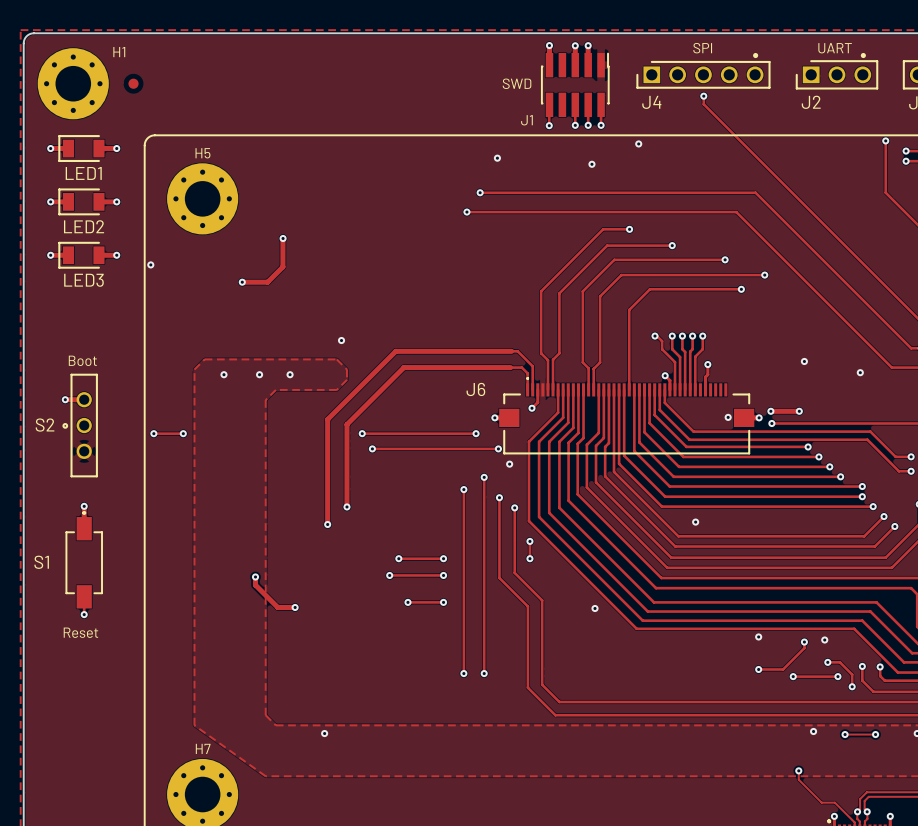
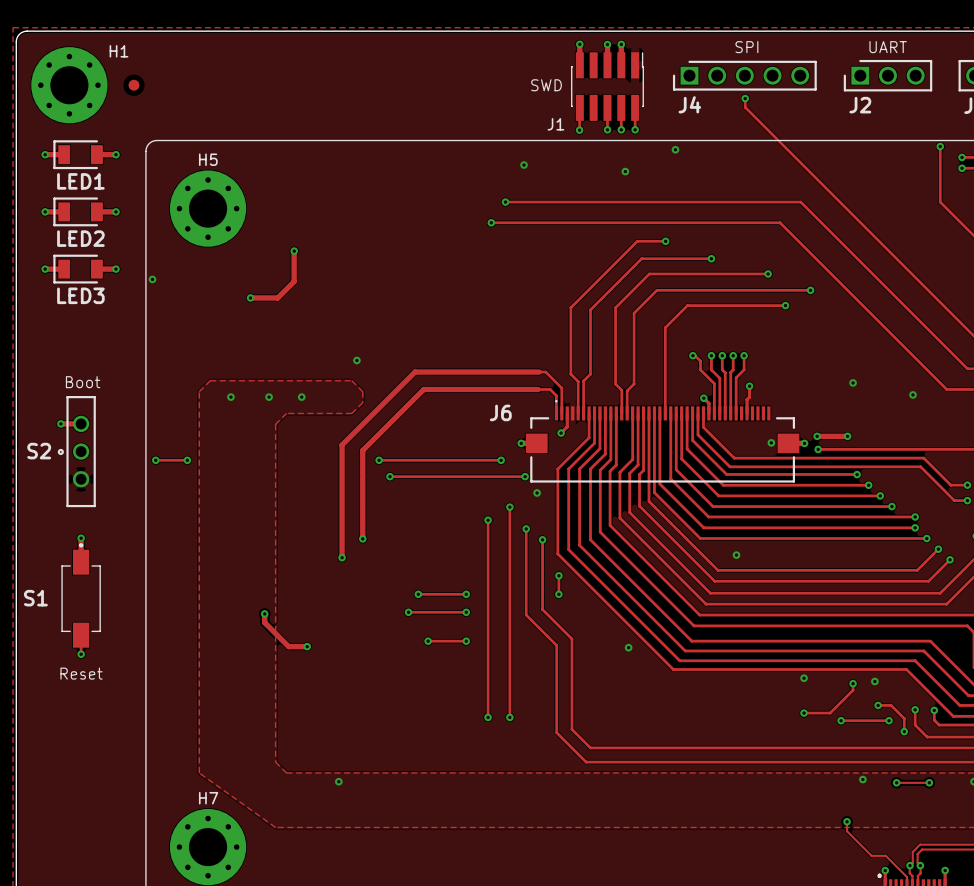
drawing: [753, 52, 759, 59] -> none
drawing: [860, 52, 866, 59] -> none

